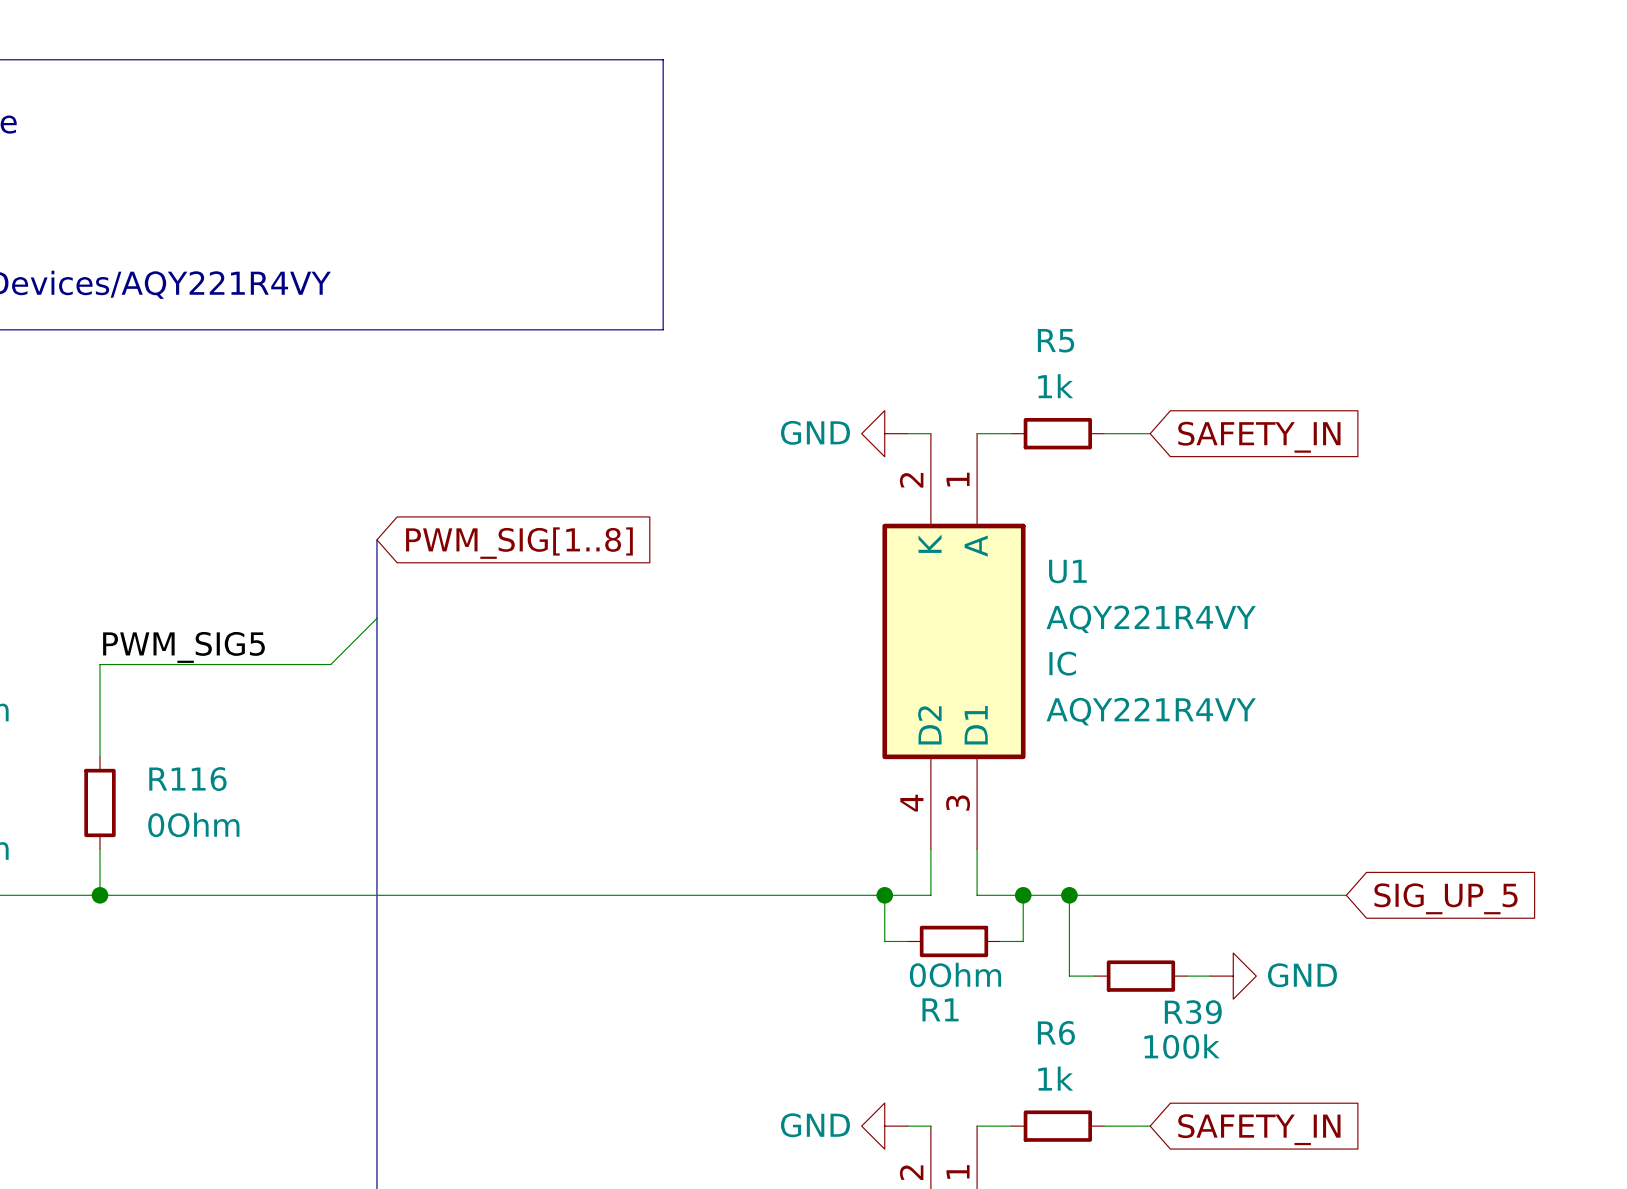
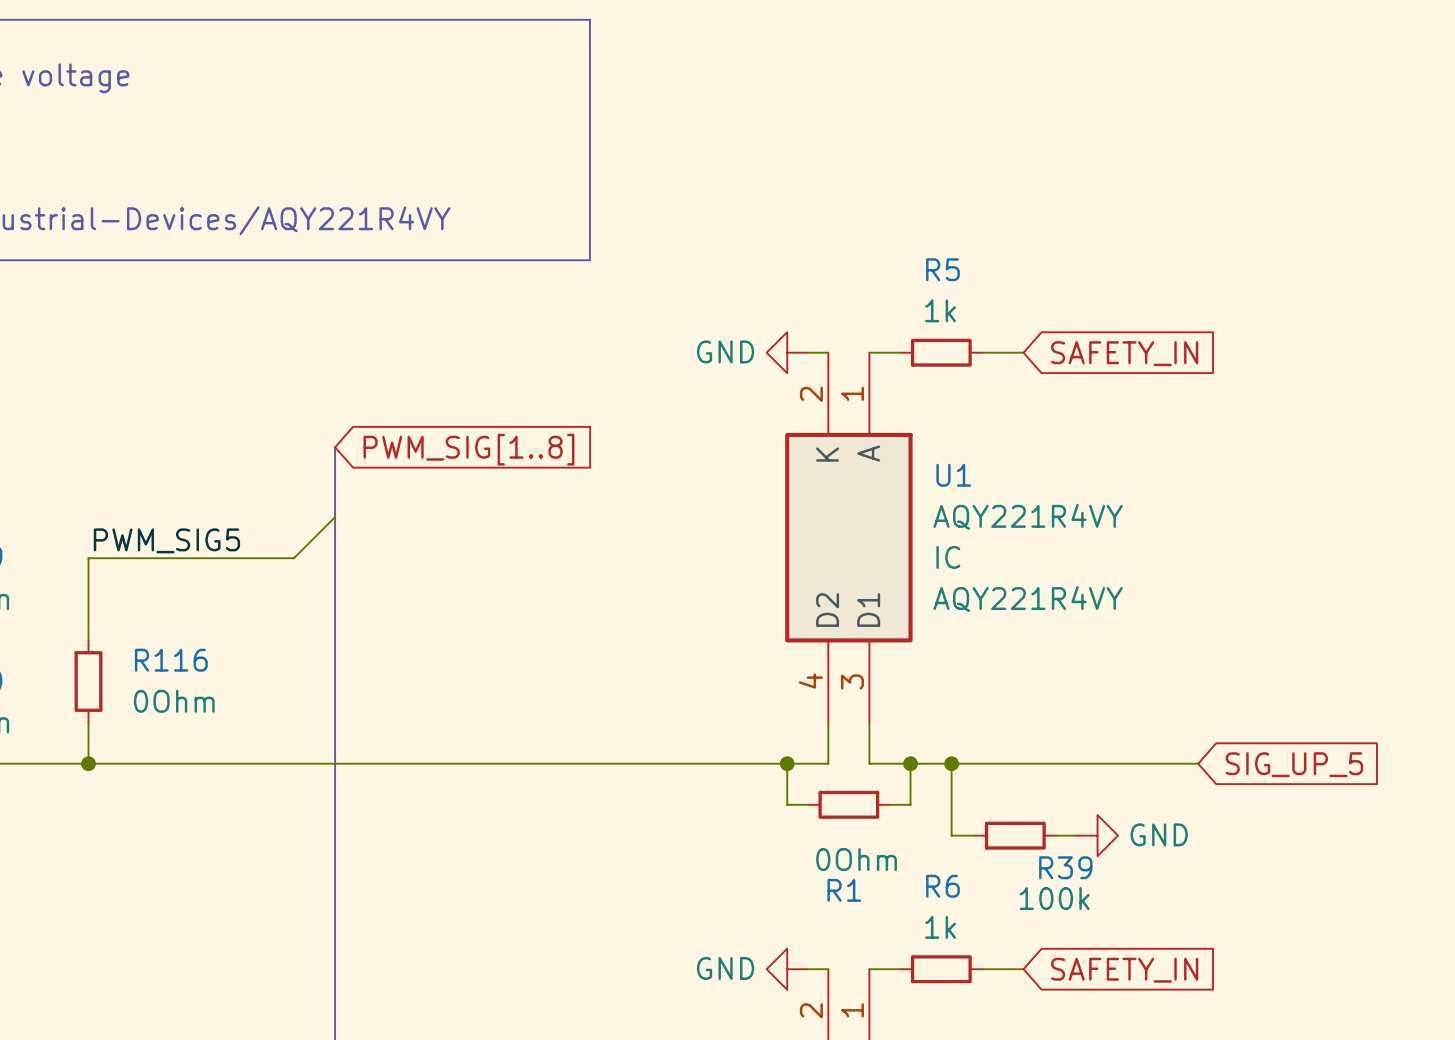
R1 value position: 0Ohm (955, 974) -> 0Ohm (856, 859)
R1 name position: R1 (940, 1009) -> R1 (844, 890)

